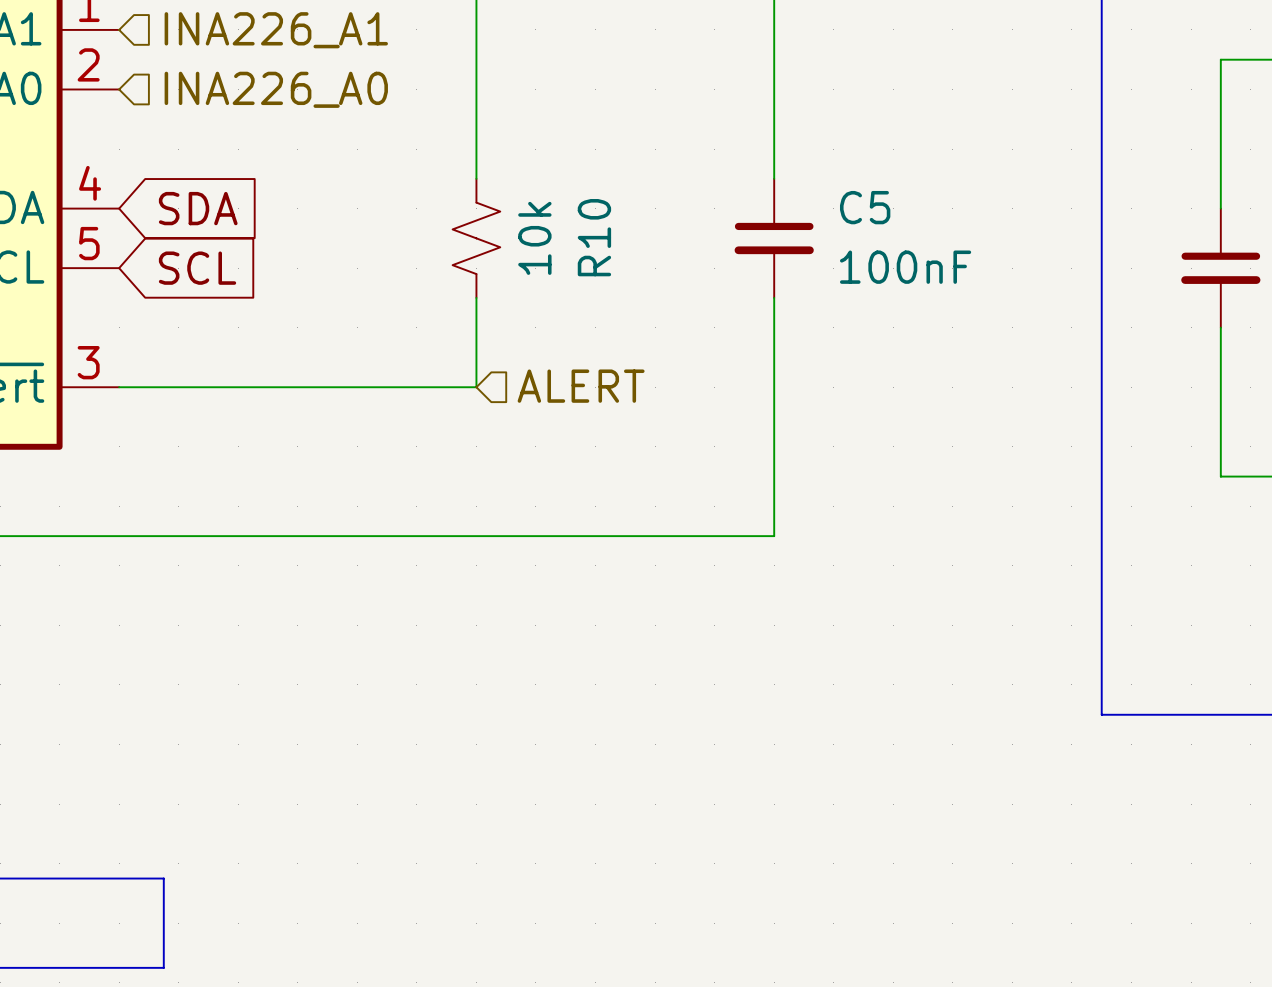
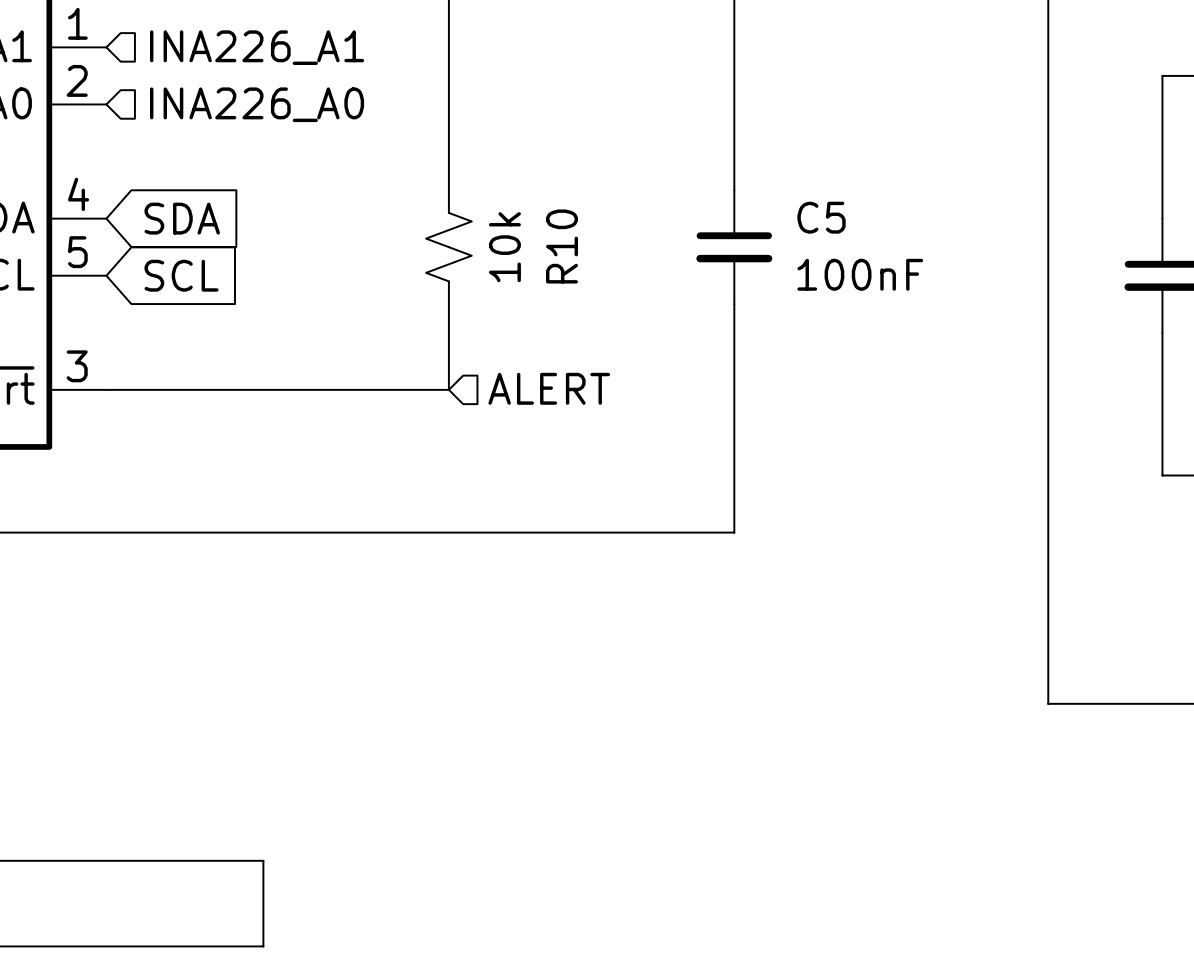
line: (163, 878) (163, 967) -> (149, 860) (263, 860) (263, 946) (149, 946)

